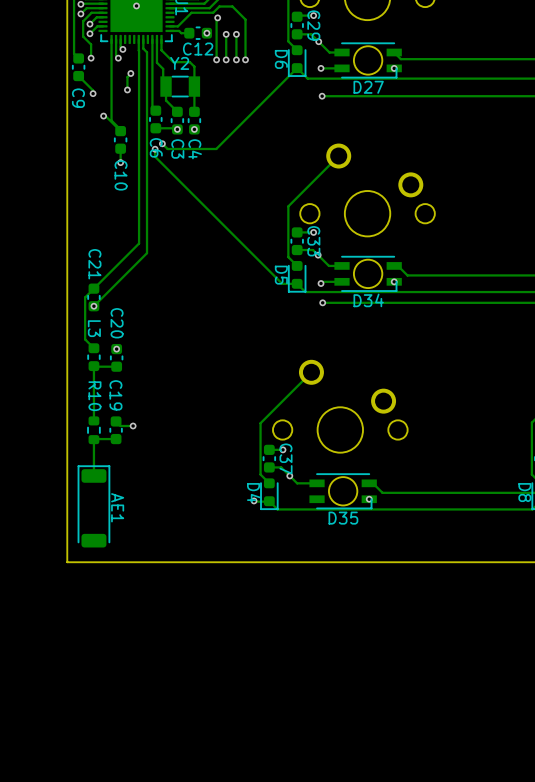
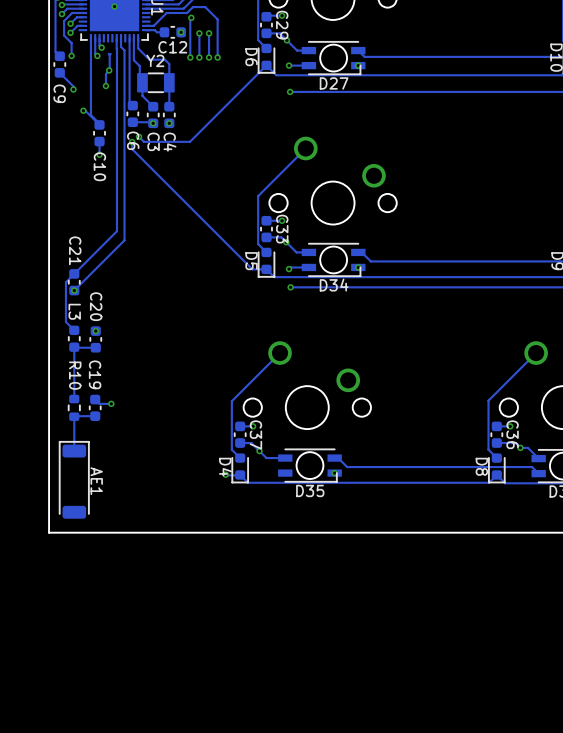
track: none -> (110, 54) (108, 54) (109, 70)

